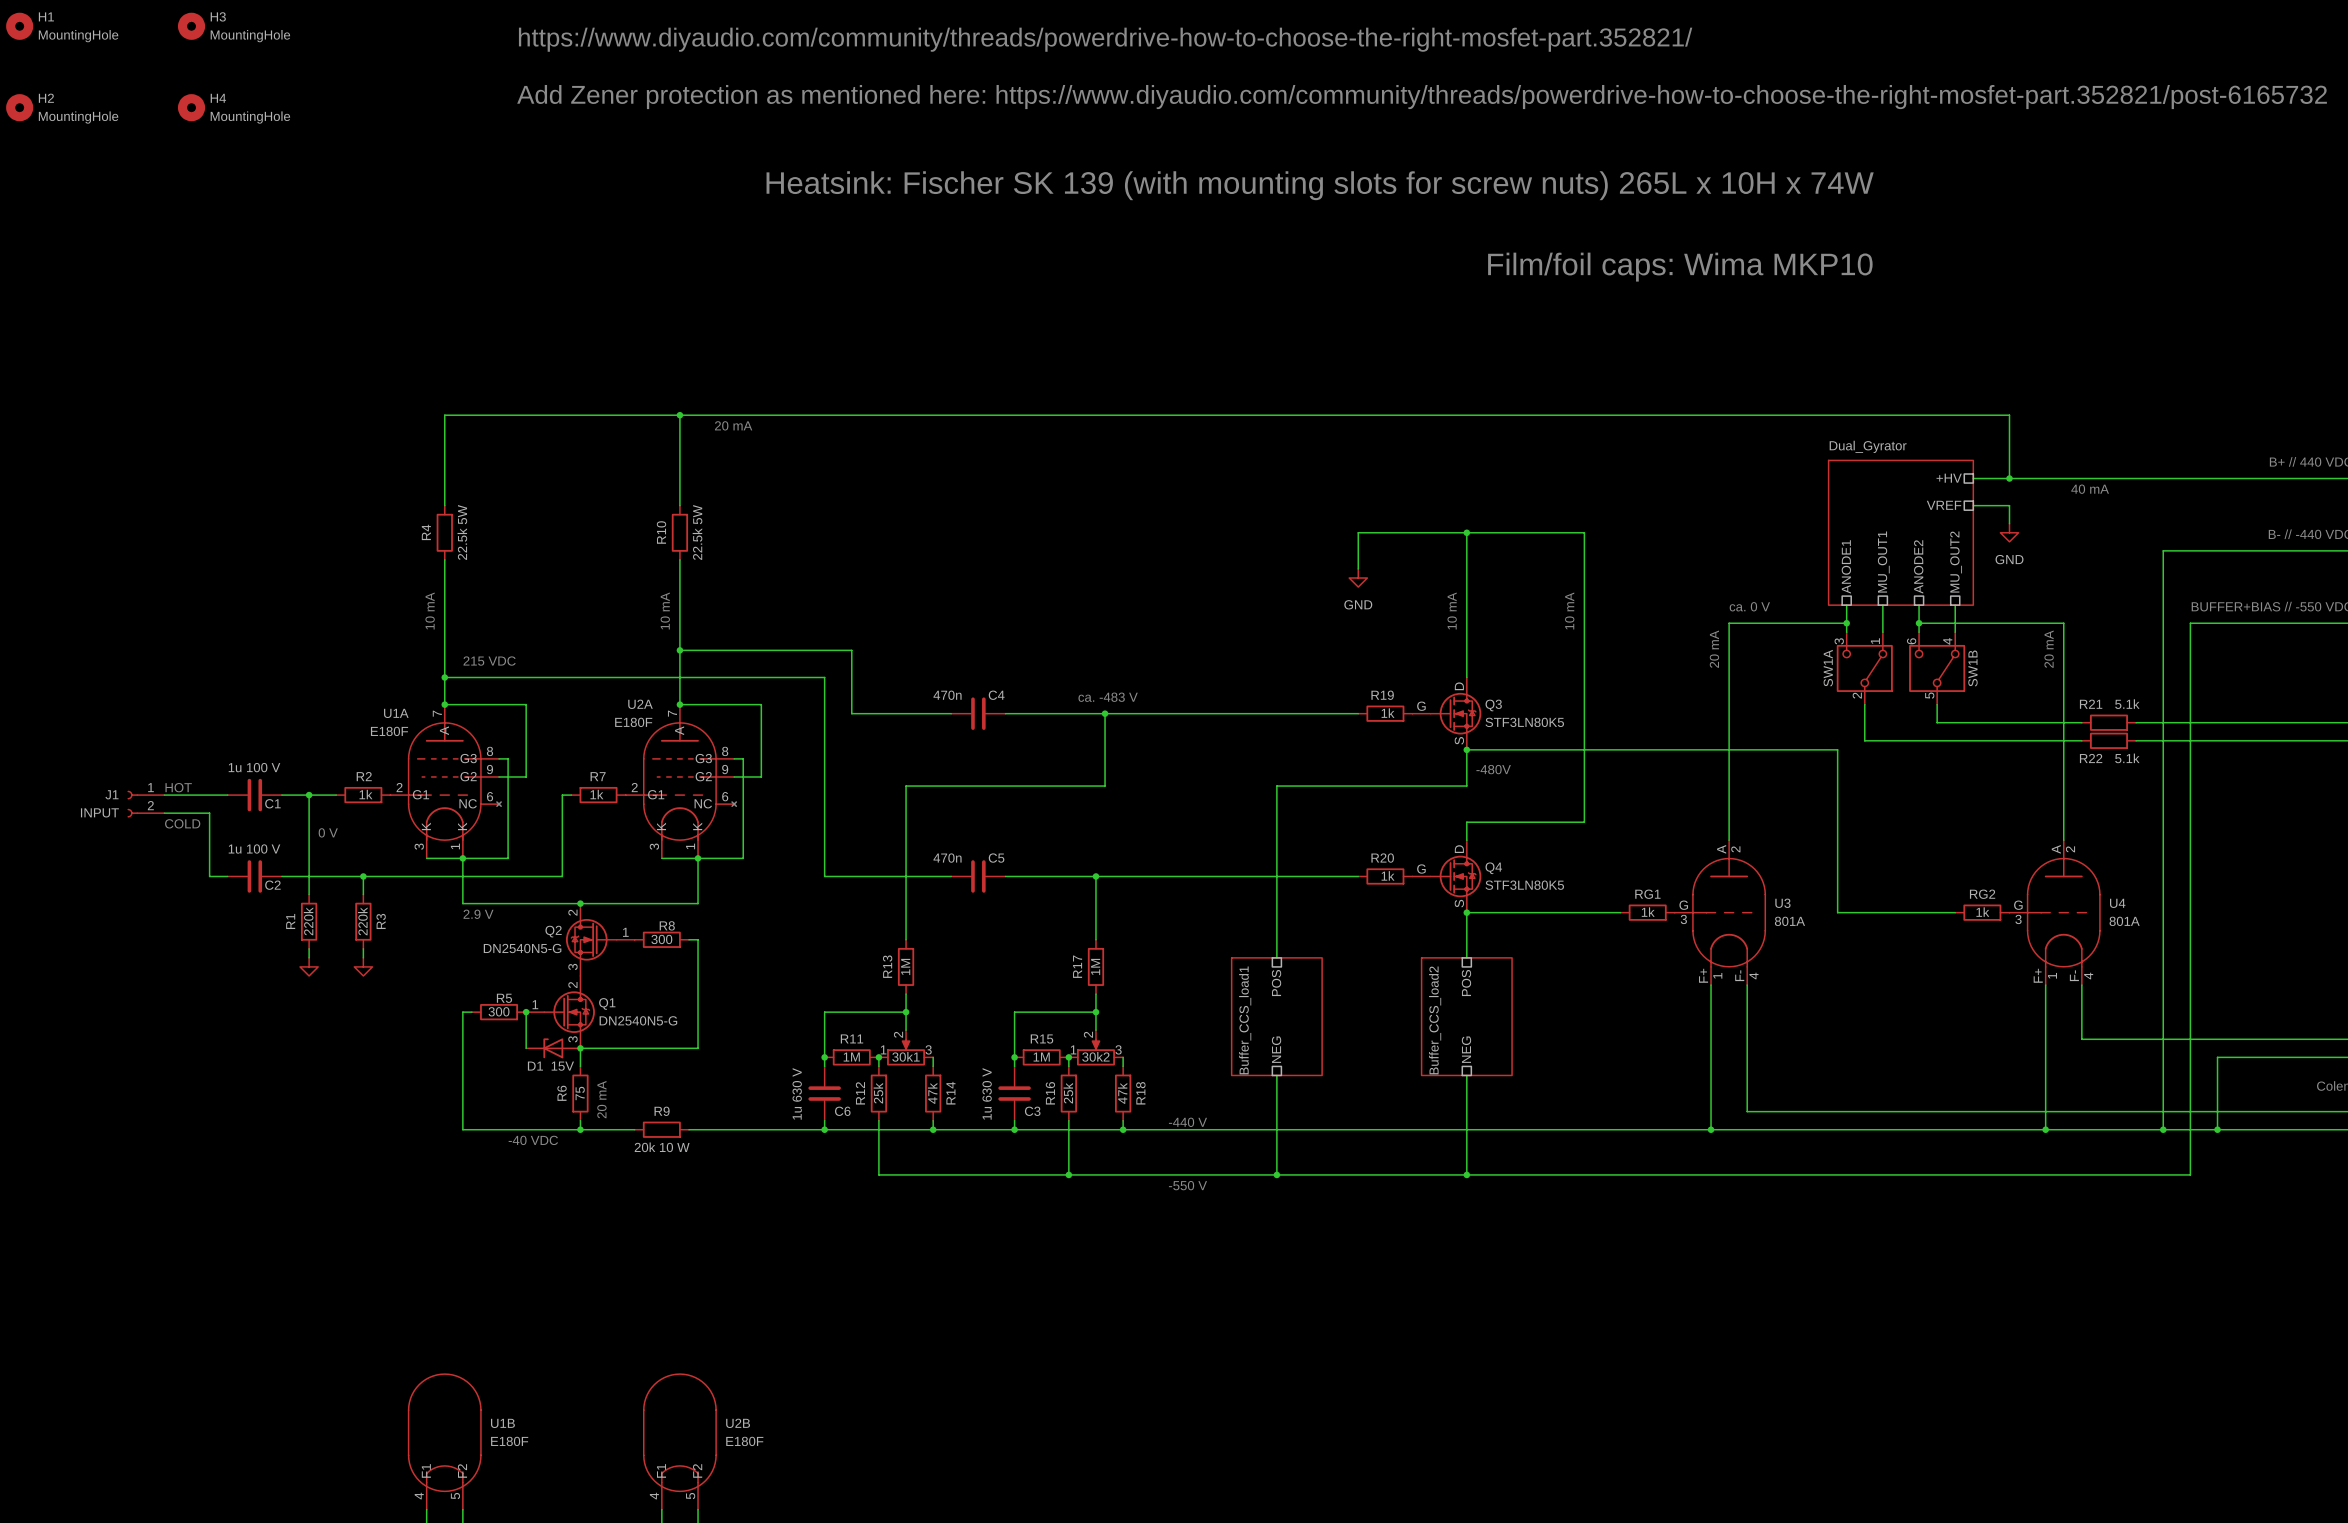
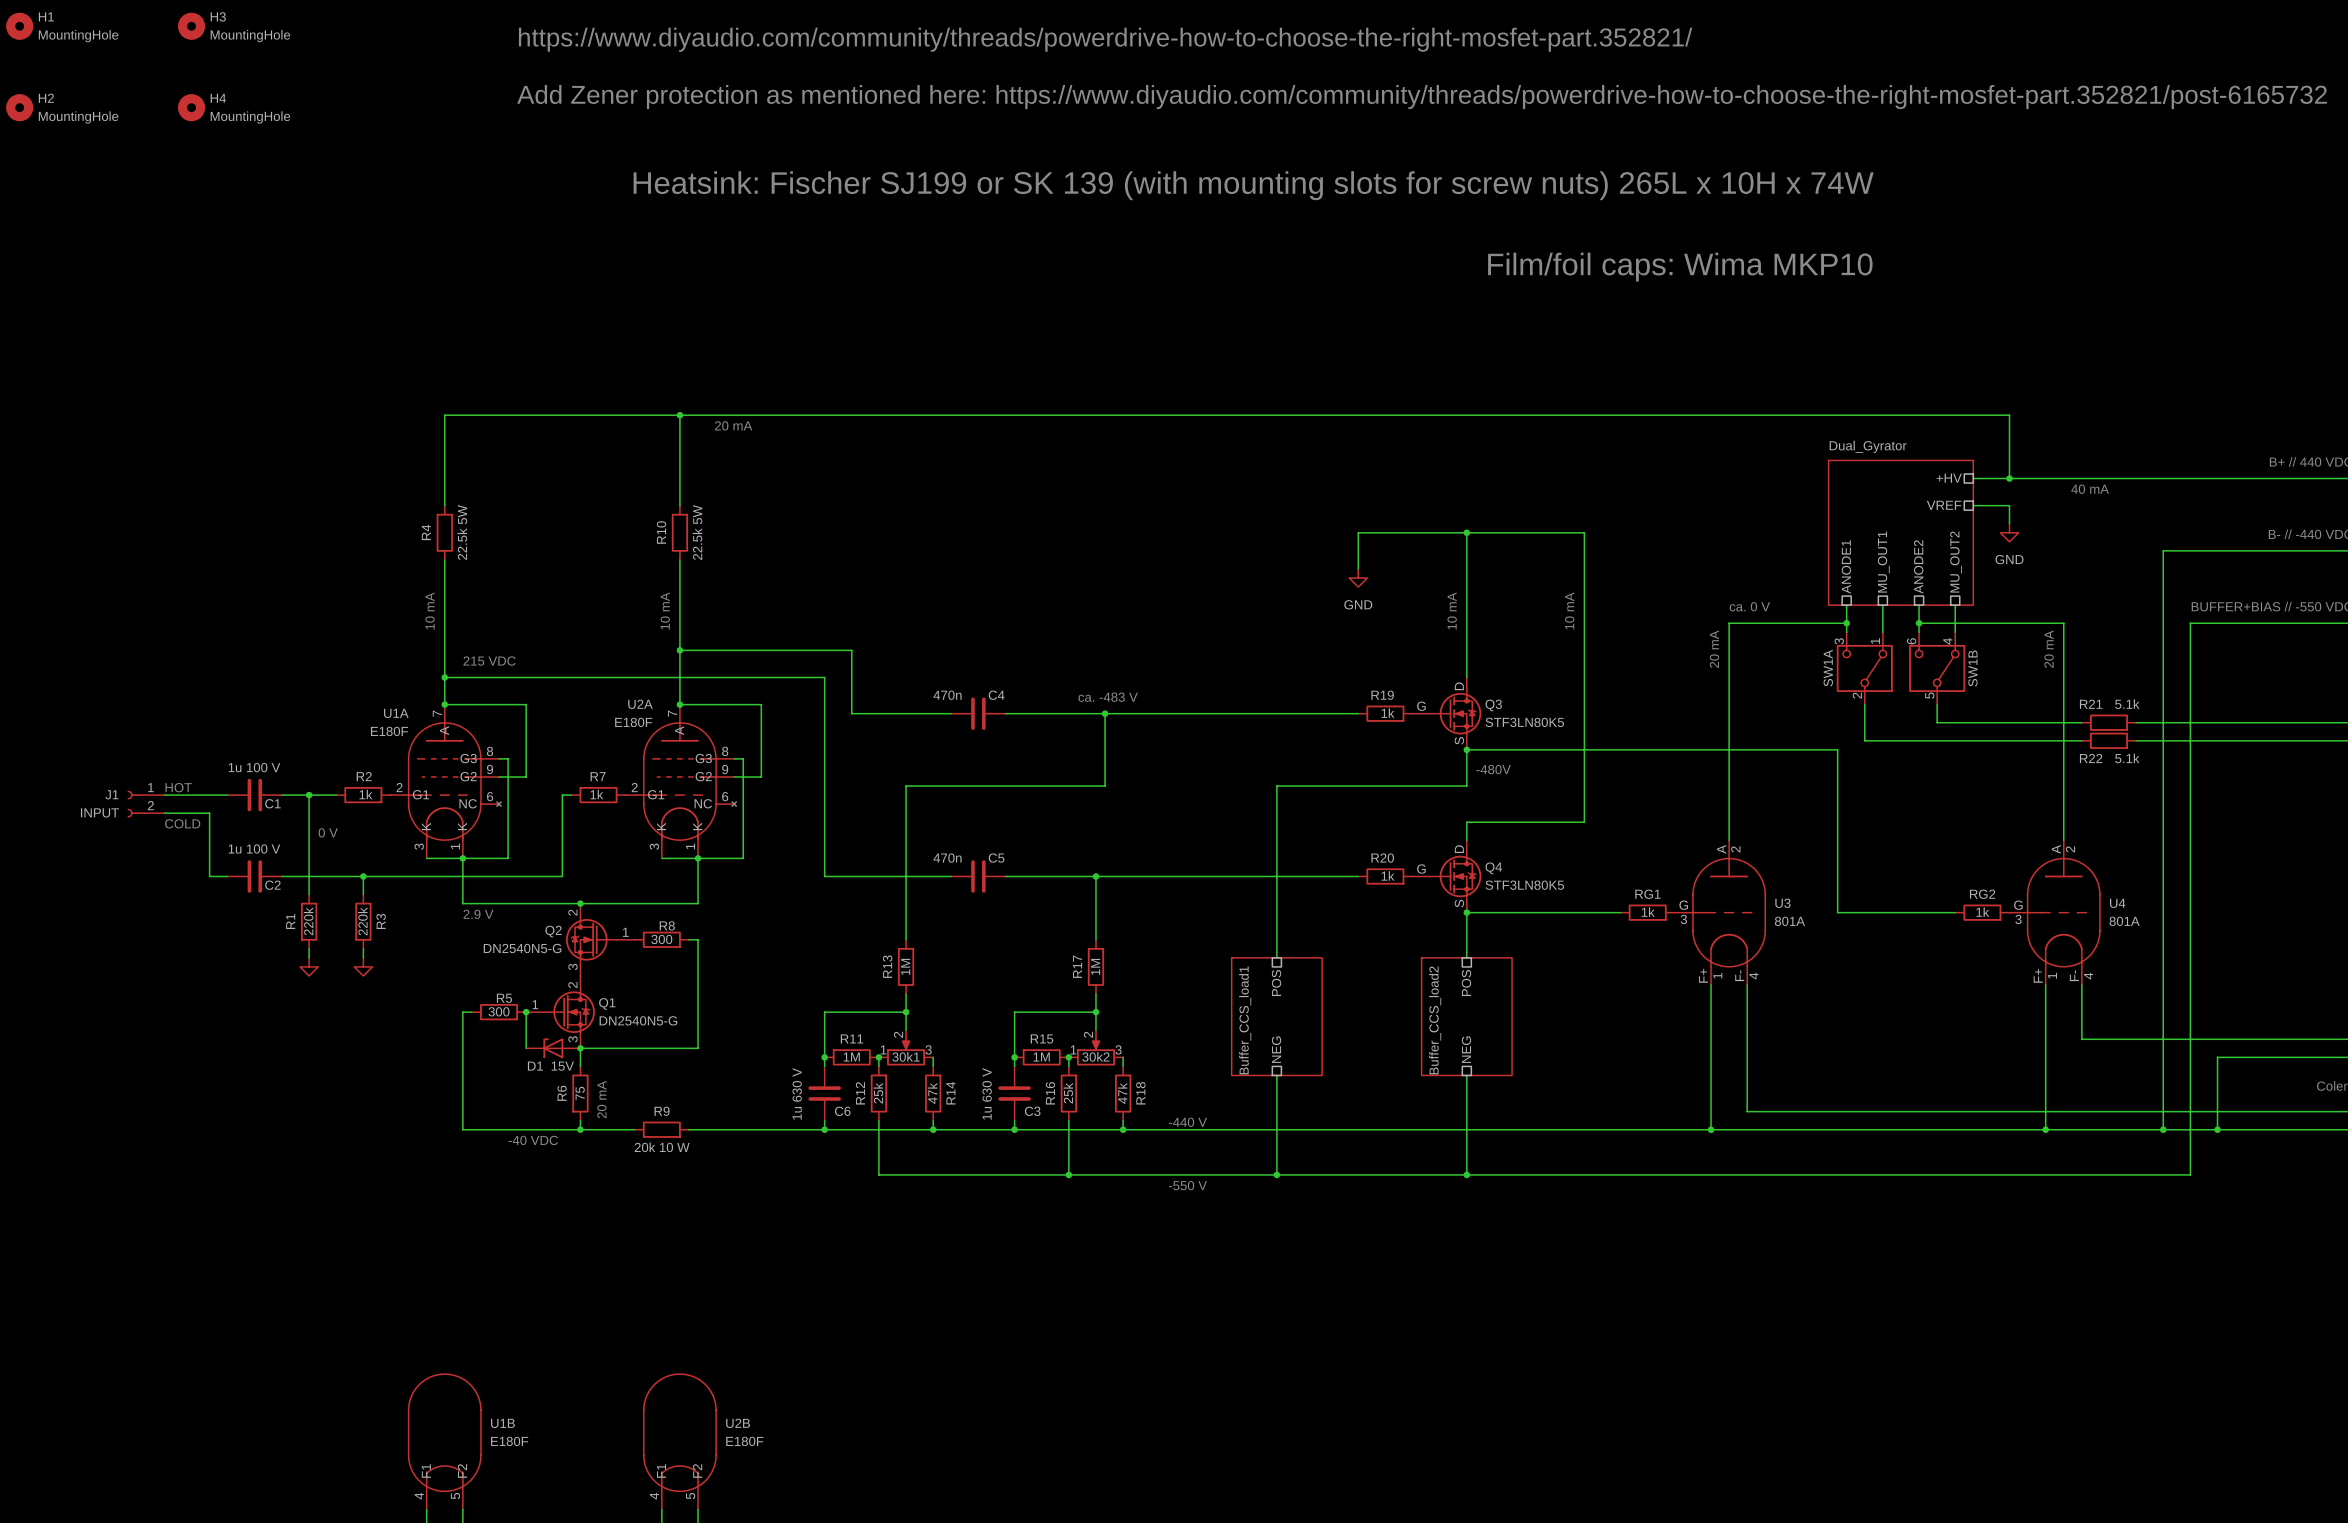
text: Heatsink: Fischer SK 139 (with mounting slots for screw nuts) 265L x 10H x 74W (1320, 185) -> Heatsink: Fischer SJ199 or SK 139 (with mounting slots for screw nuts) 265L x 10H x 74W (1253, 185)

